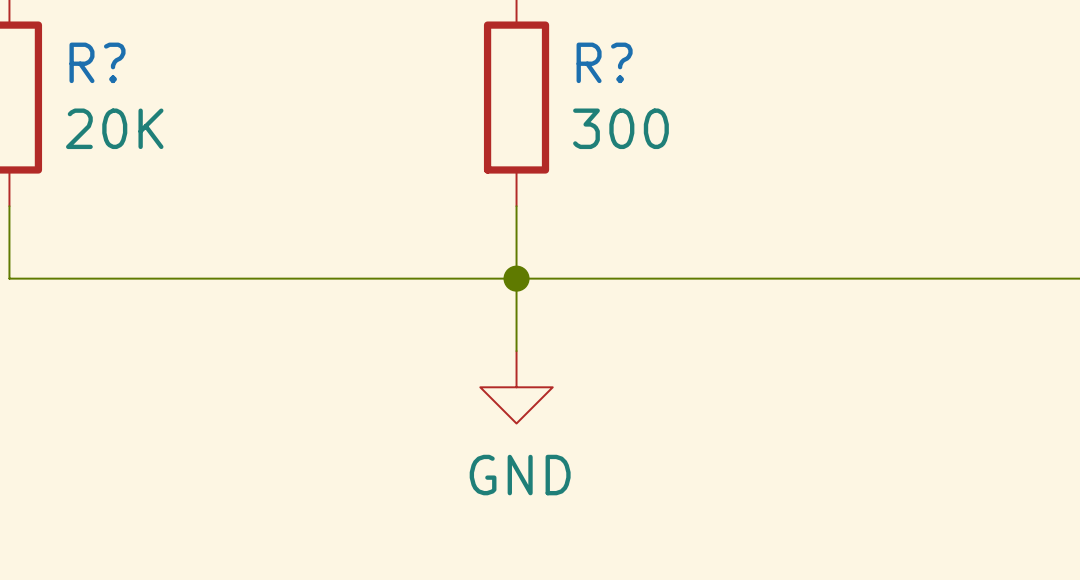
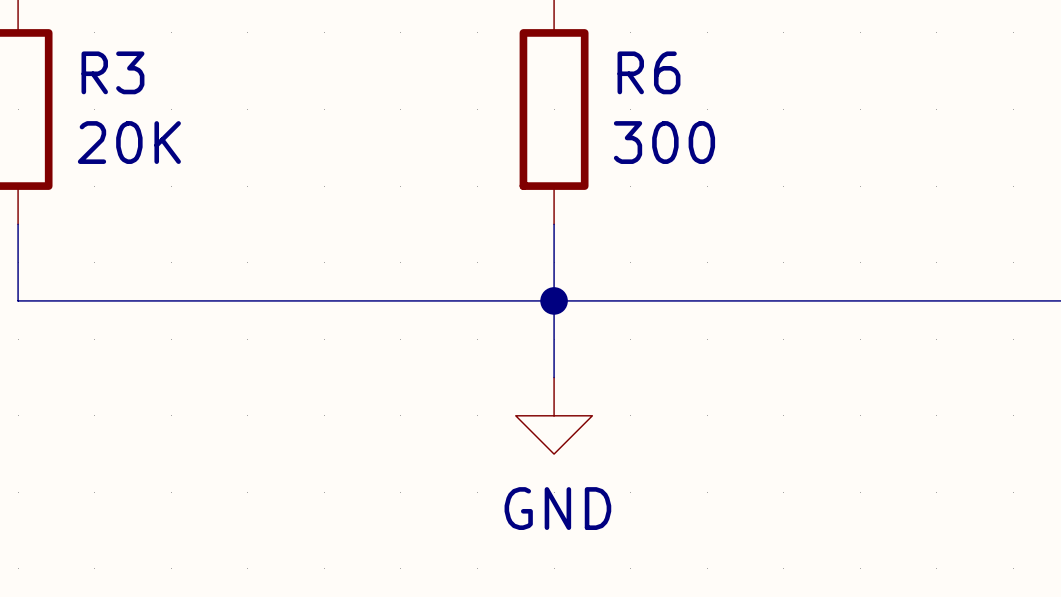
R? name: R? (97, 62) -> R3 (112, 72)
R? name: R? (604, 62) -> R6 (648, 72)

